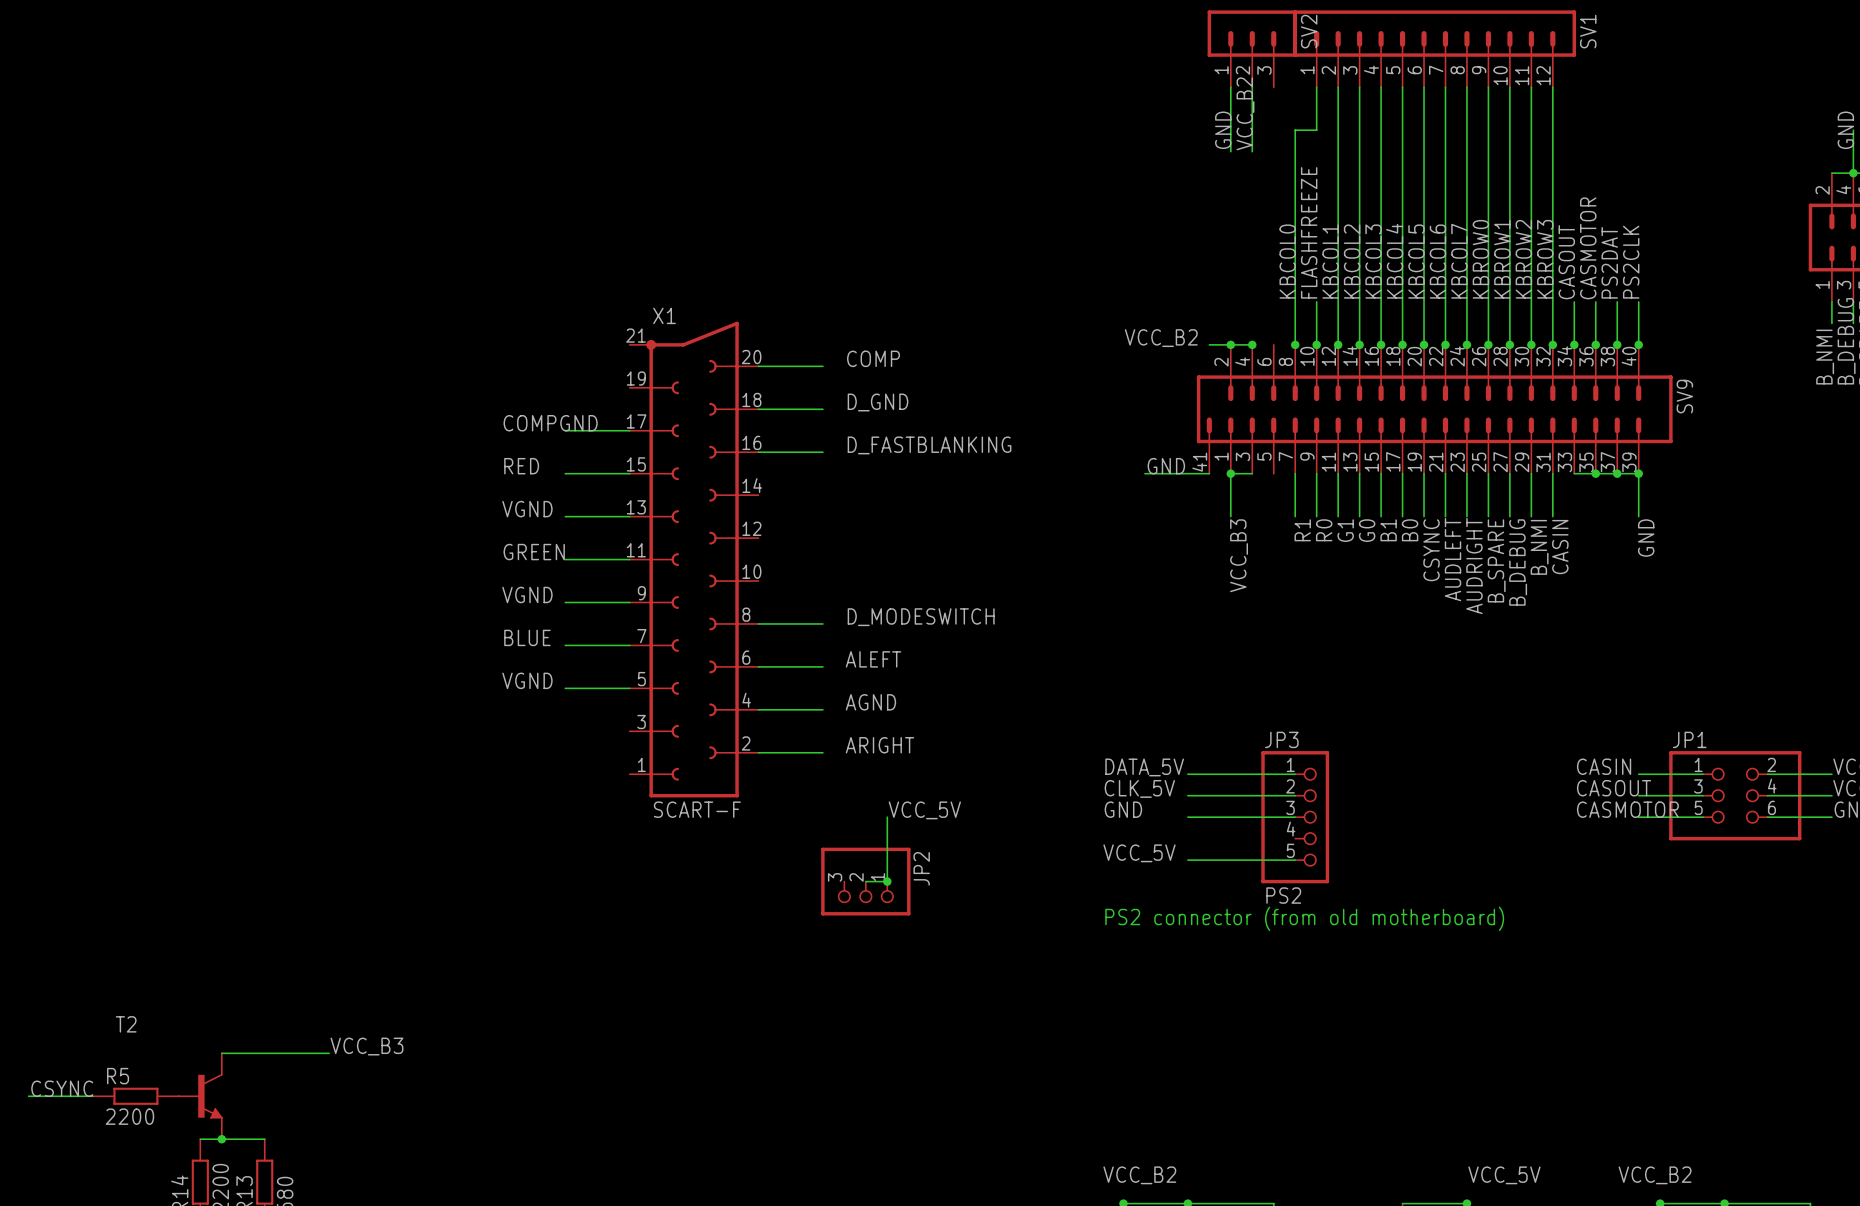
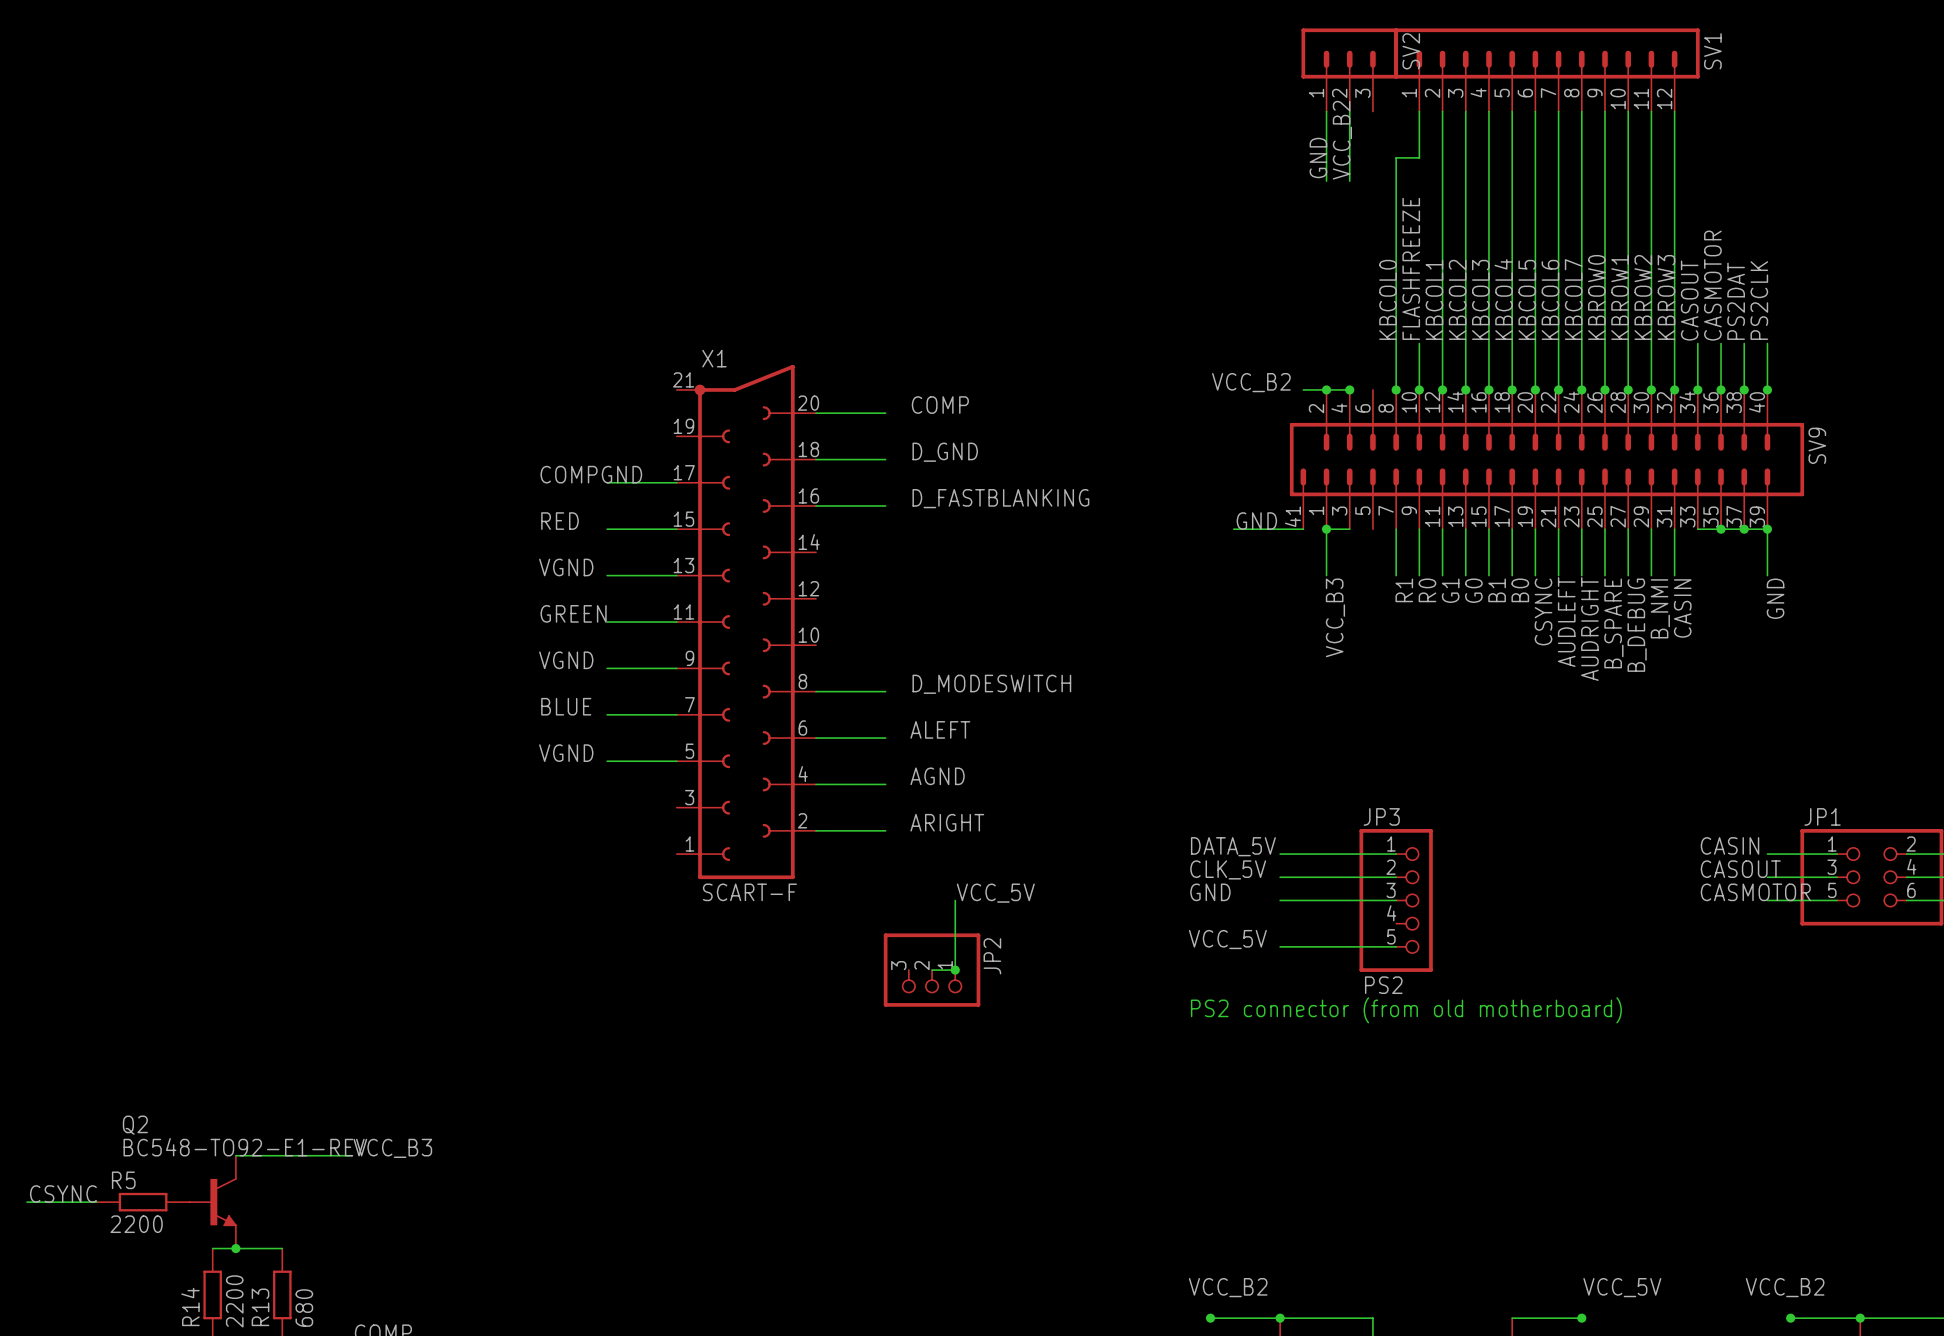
T2 name: T2 (126, 1024) -> Q2 (135, 1125)
T2 value: none -> BC548-TO92-E1-REV (245, 1147)

